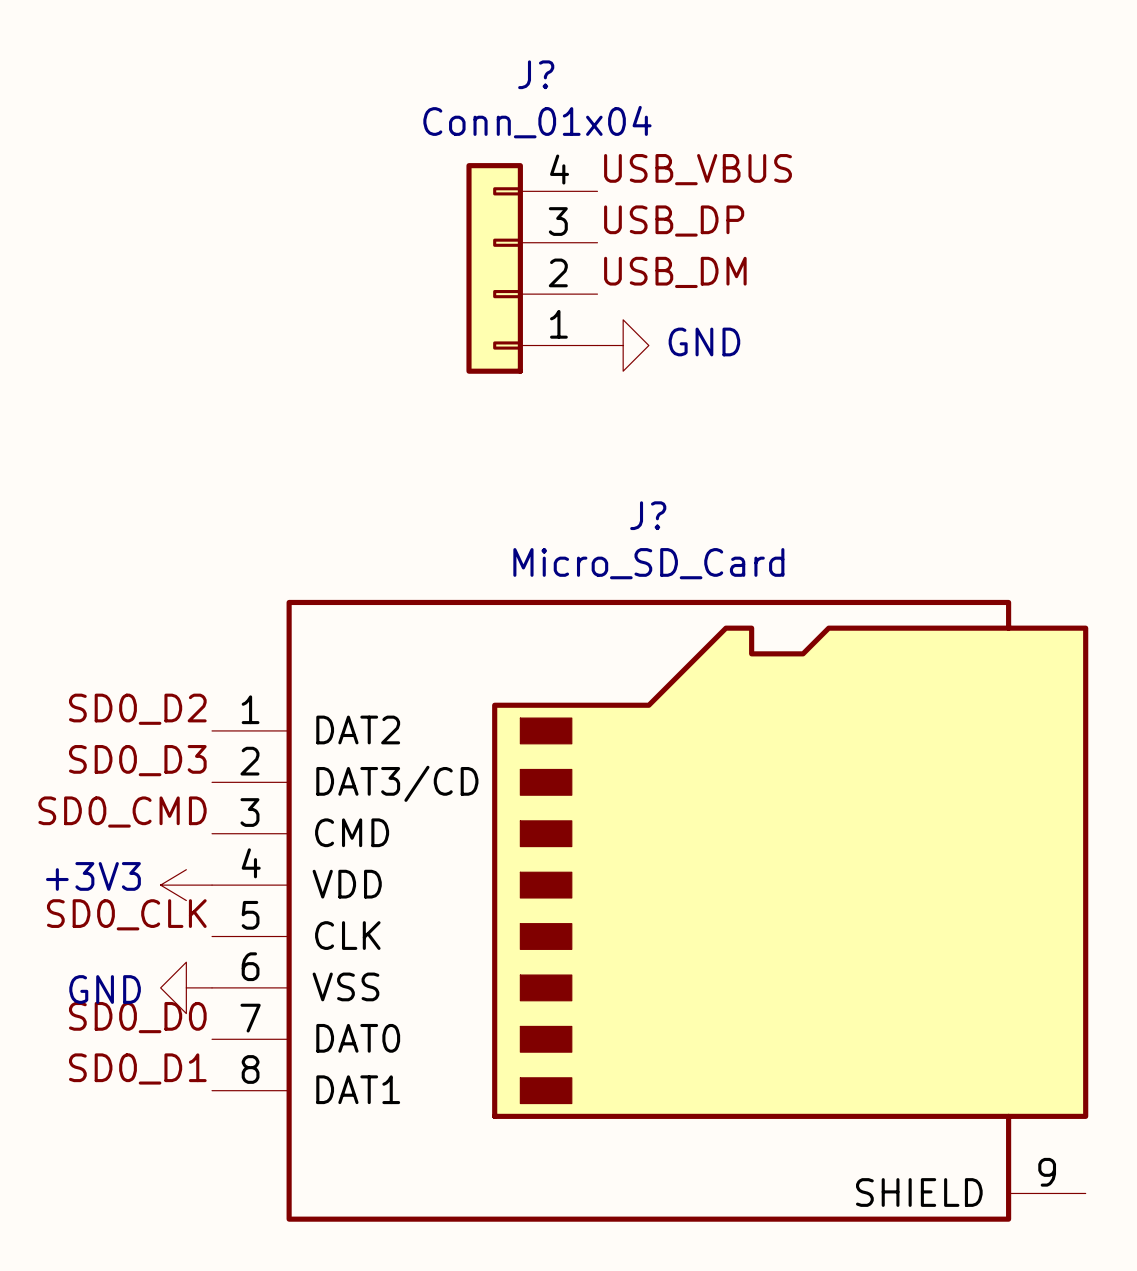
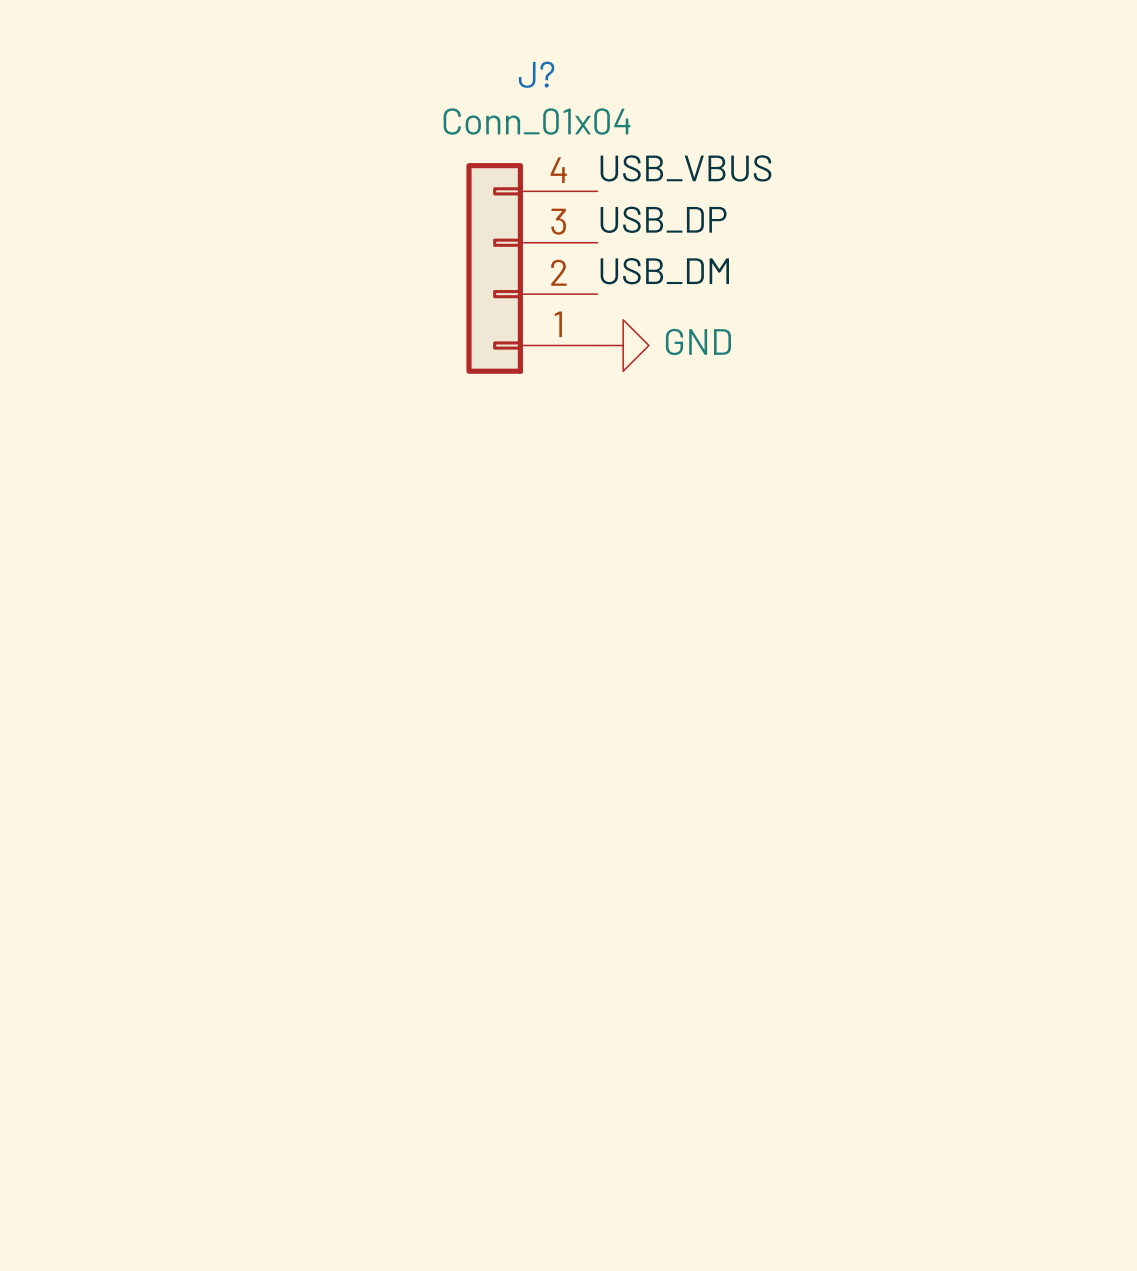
label: SD0_D2 (137, 709) -> none
label: SD0_D3 (137, 760) -> none
label: SD0_CMD (122, 812) -> none
power symbol: +3V3 (186, 885) -> none
J?: Micro_SD_Card (650, 910) -> none
label: SD0_CLK (126, 914) -> none
power symbol: GND (186, 987) -> none
label: SD0_D0 (137, 1017) -> none
label: SD0_D1 (137, 1068) -> none

